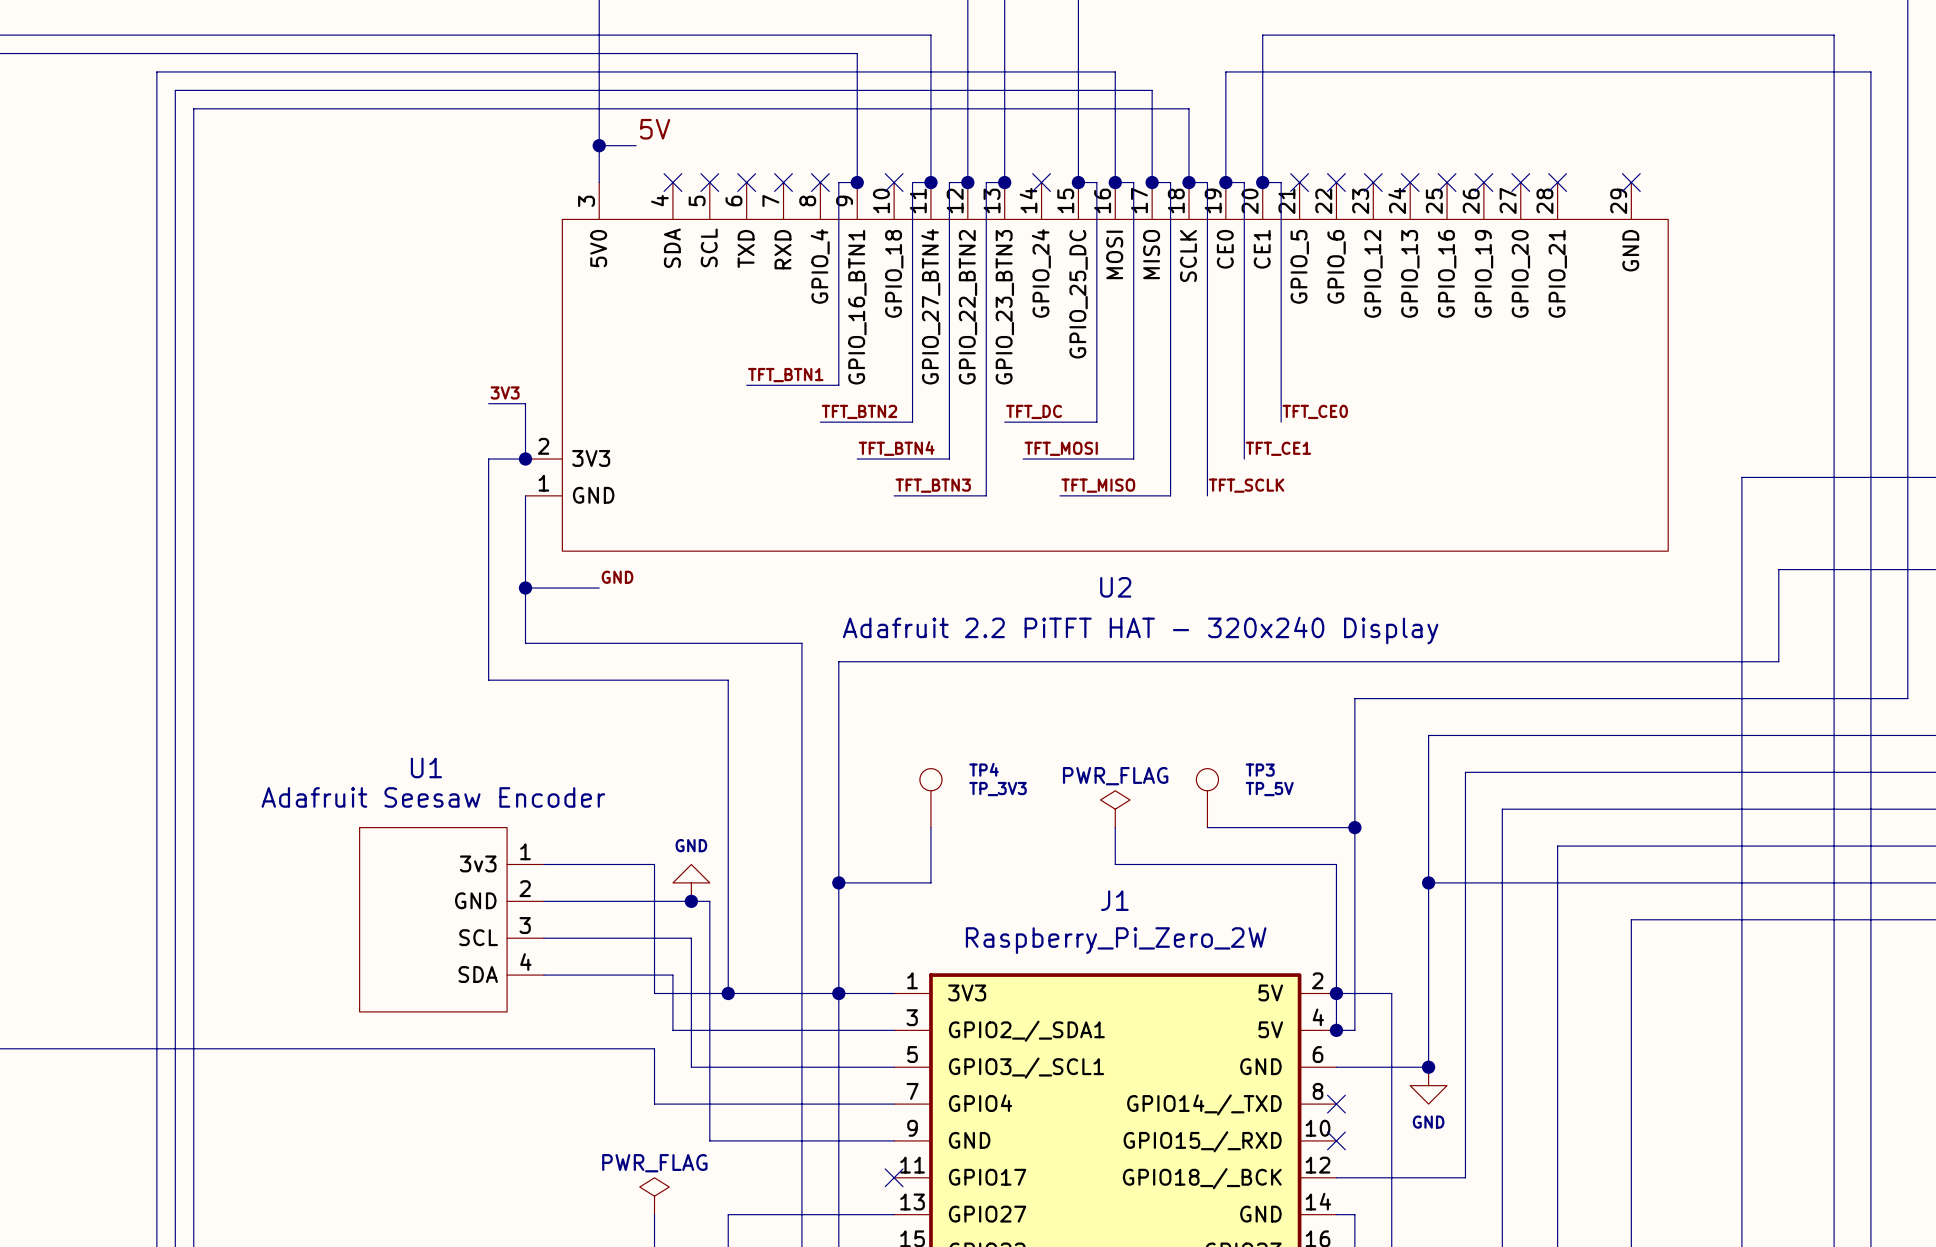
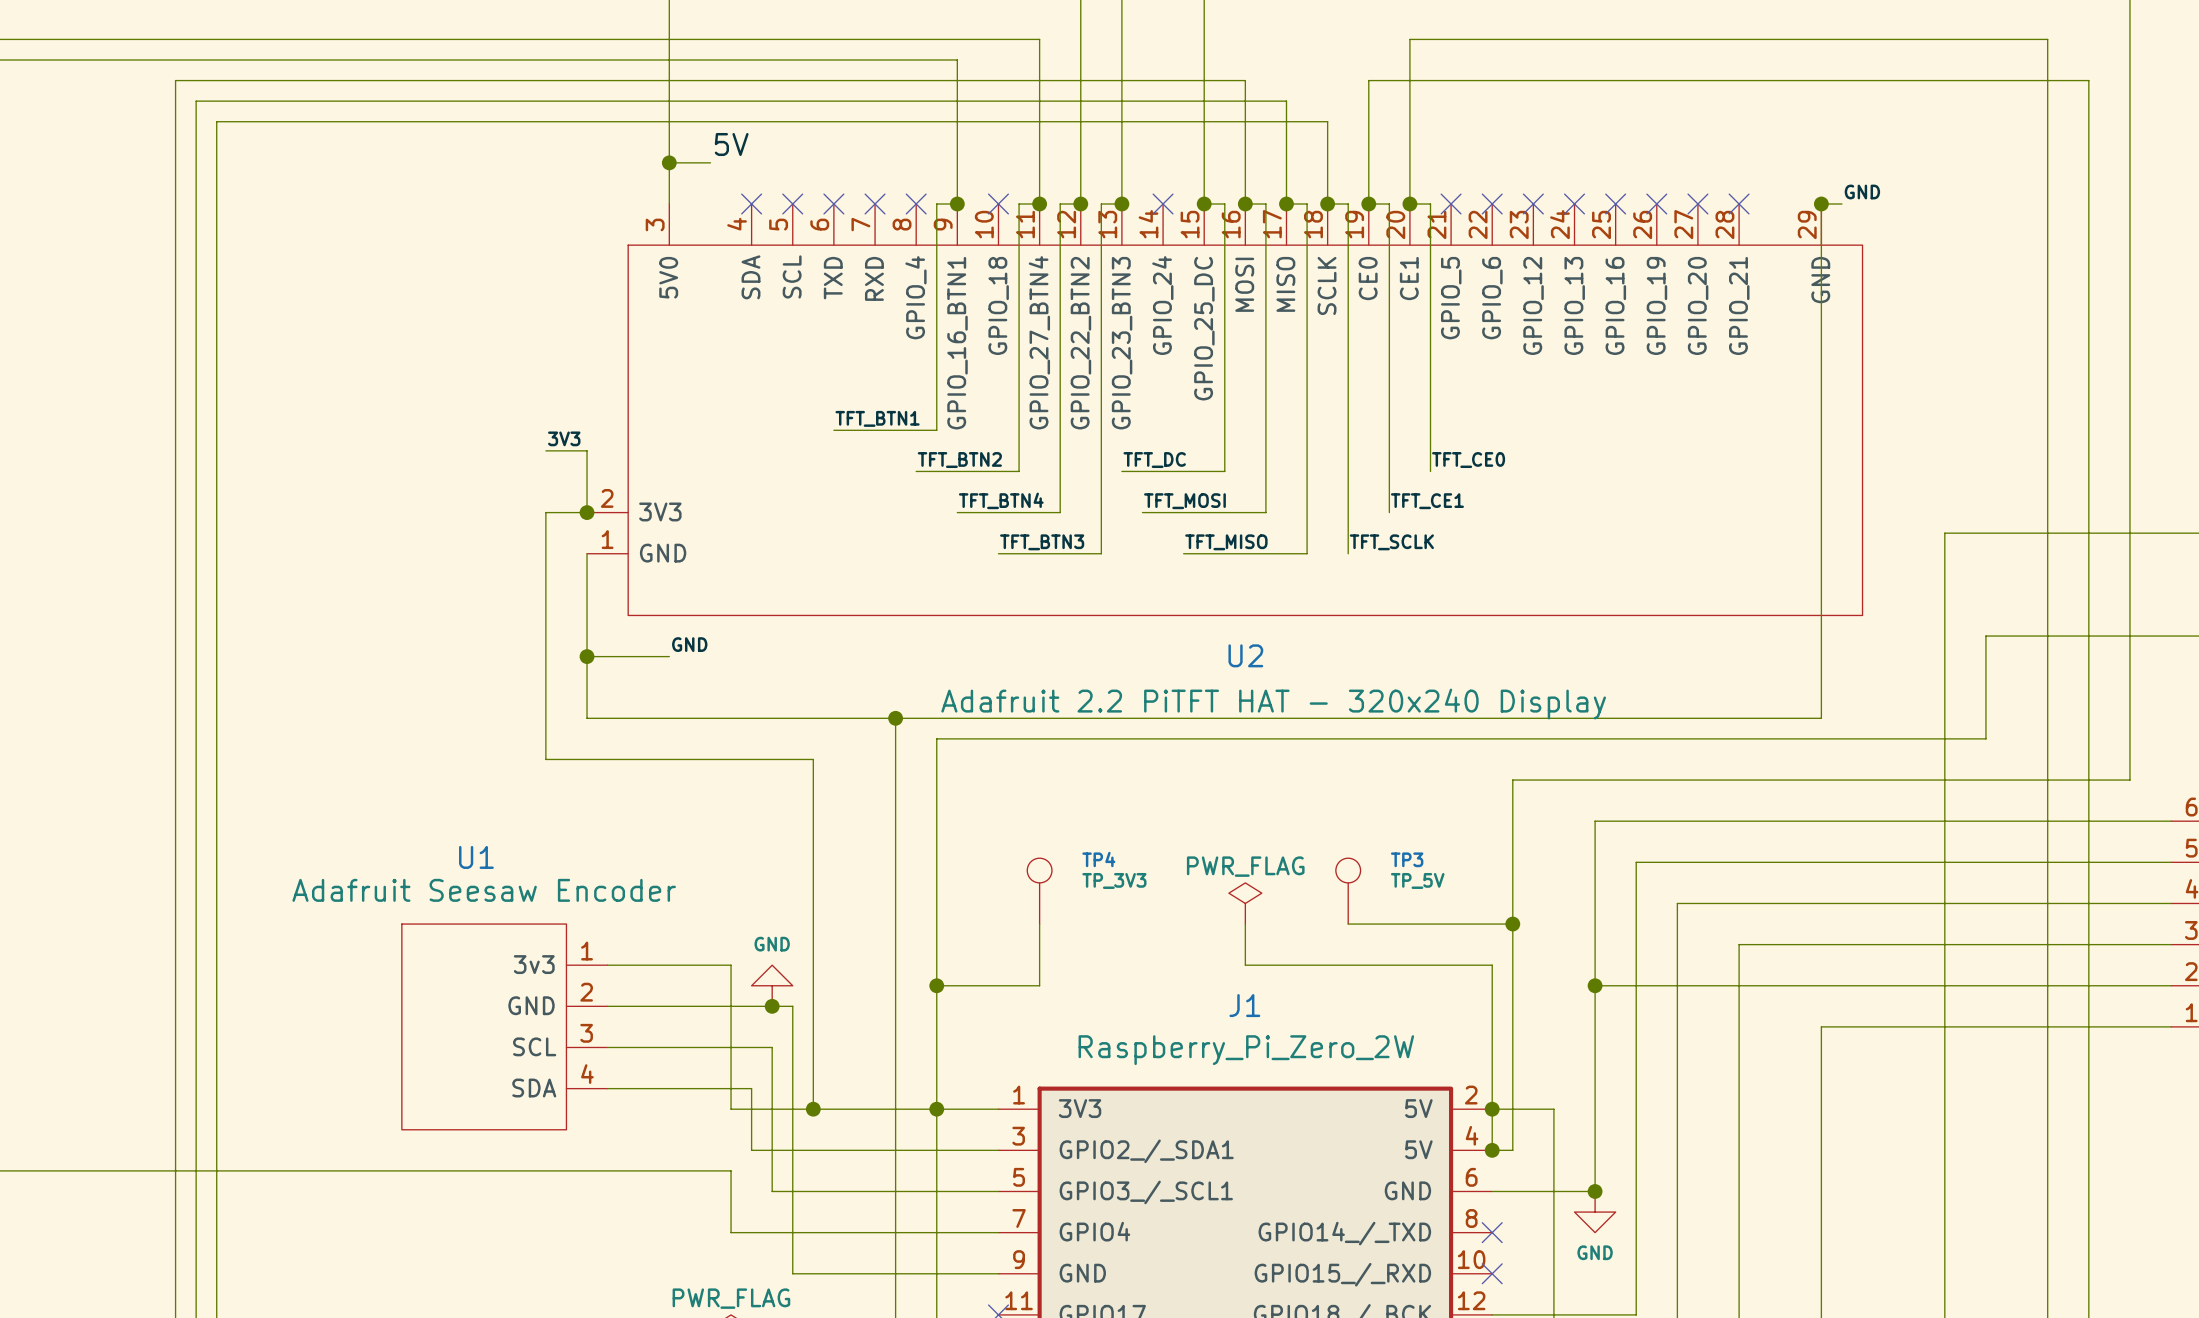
label: none -> GND (1862, 192)
no-connect mark: (1631, 182) -> none
junction: none -> (1821, 204)
wire: none -> (1841, 204) (1821, 204) (1821, 718) (895, 718)
junction: none -> (895, 718)

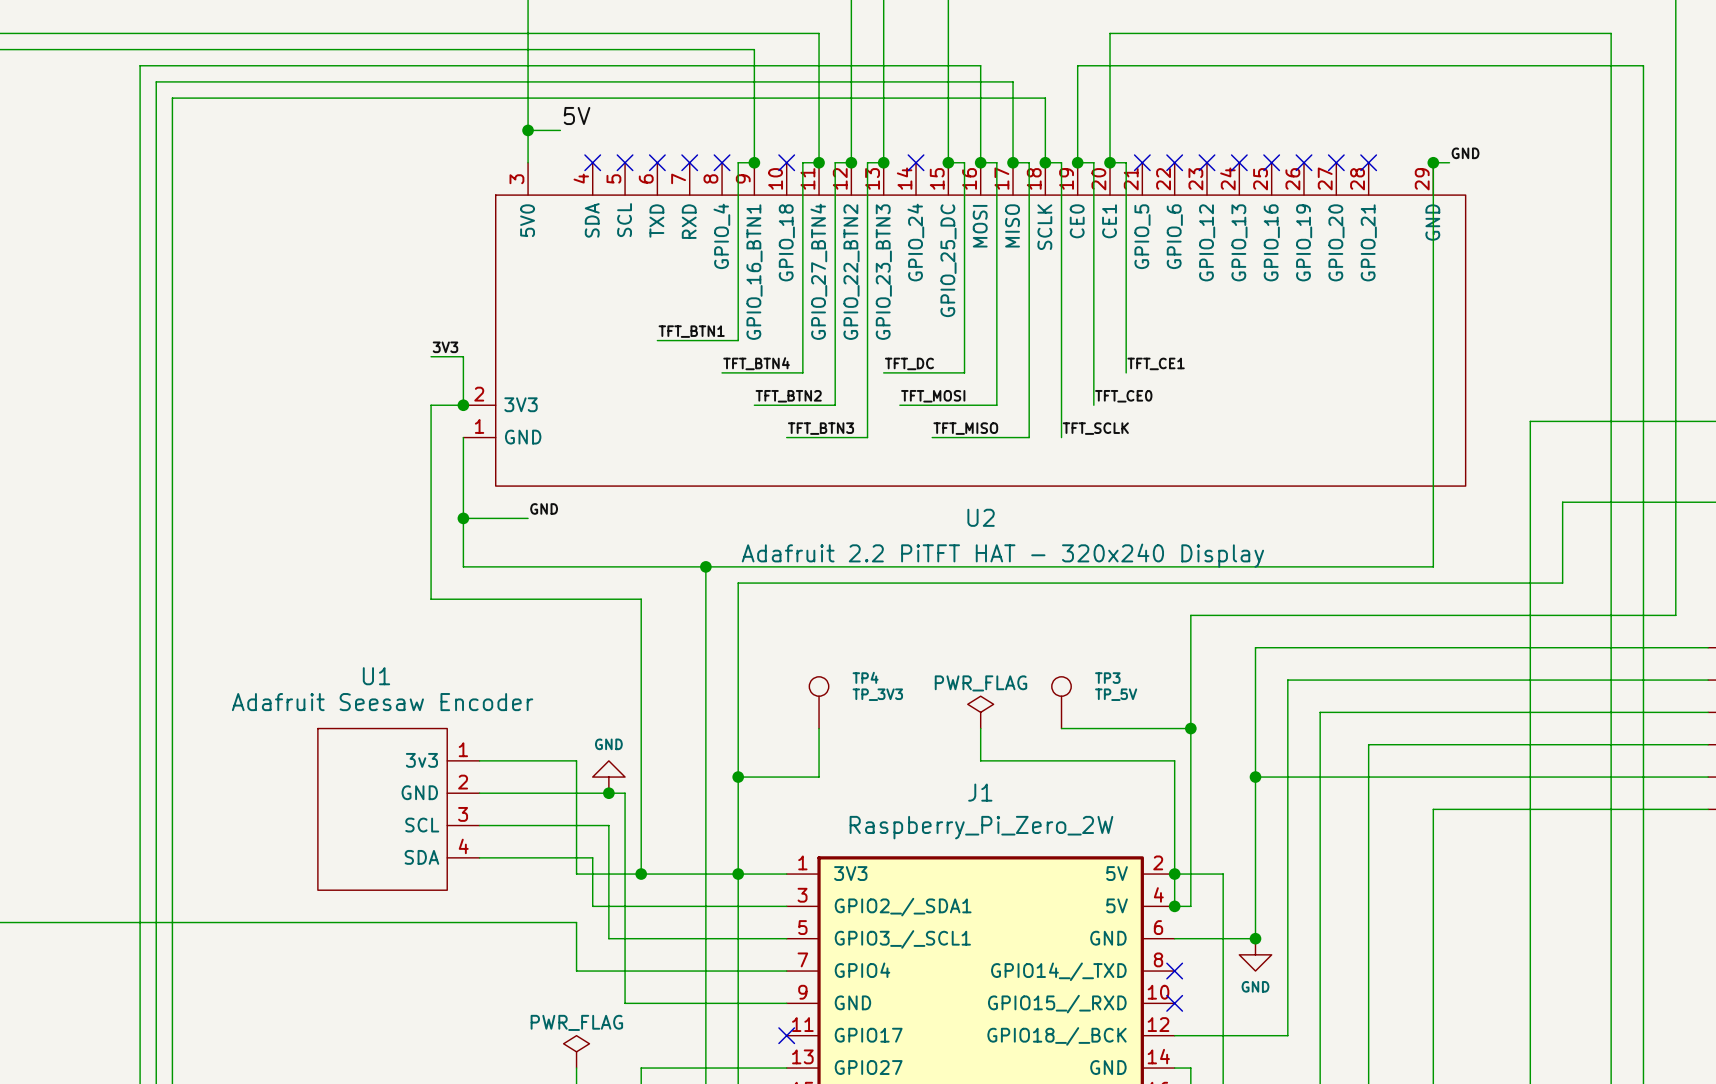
label: TFT_BTN2 (959, 460) -> TFT_BTN4 (756, 363)
label: TFT_CE0 (1468, 460) -> TFT_CE1 (1156, 363)
label: TFT_BTN4 (1001, 500) -> TFT_BTN2 (788, 396)
label: TFT_CE1 (1427, 501) -> TFT_CE0 (1123, 396)

